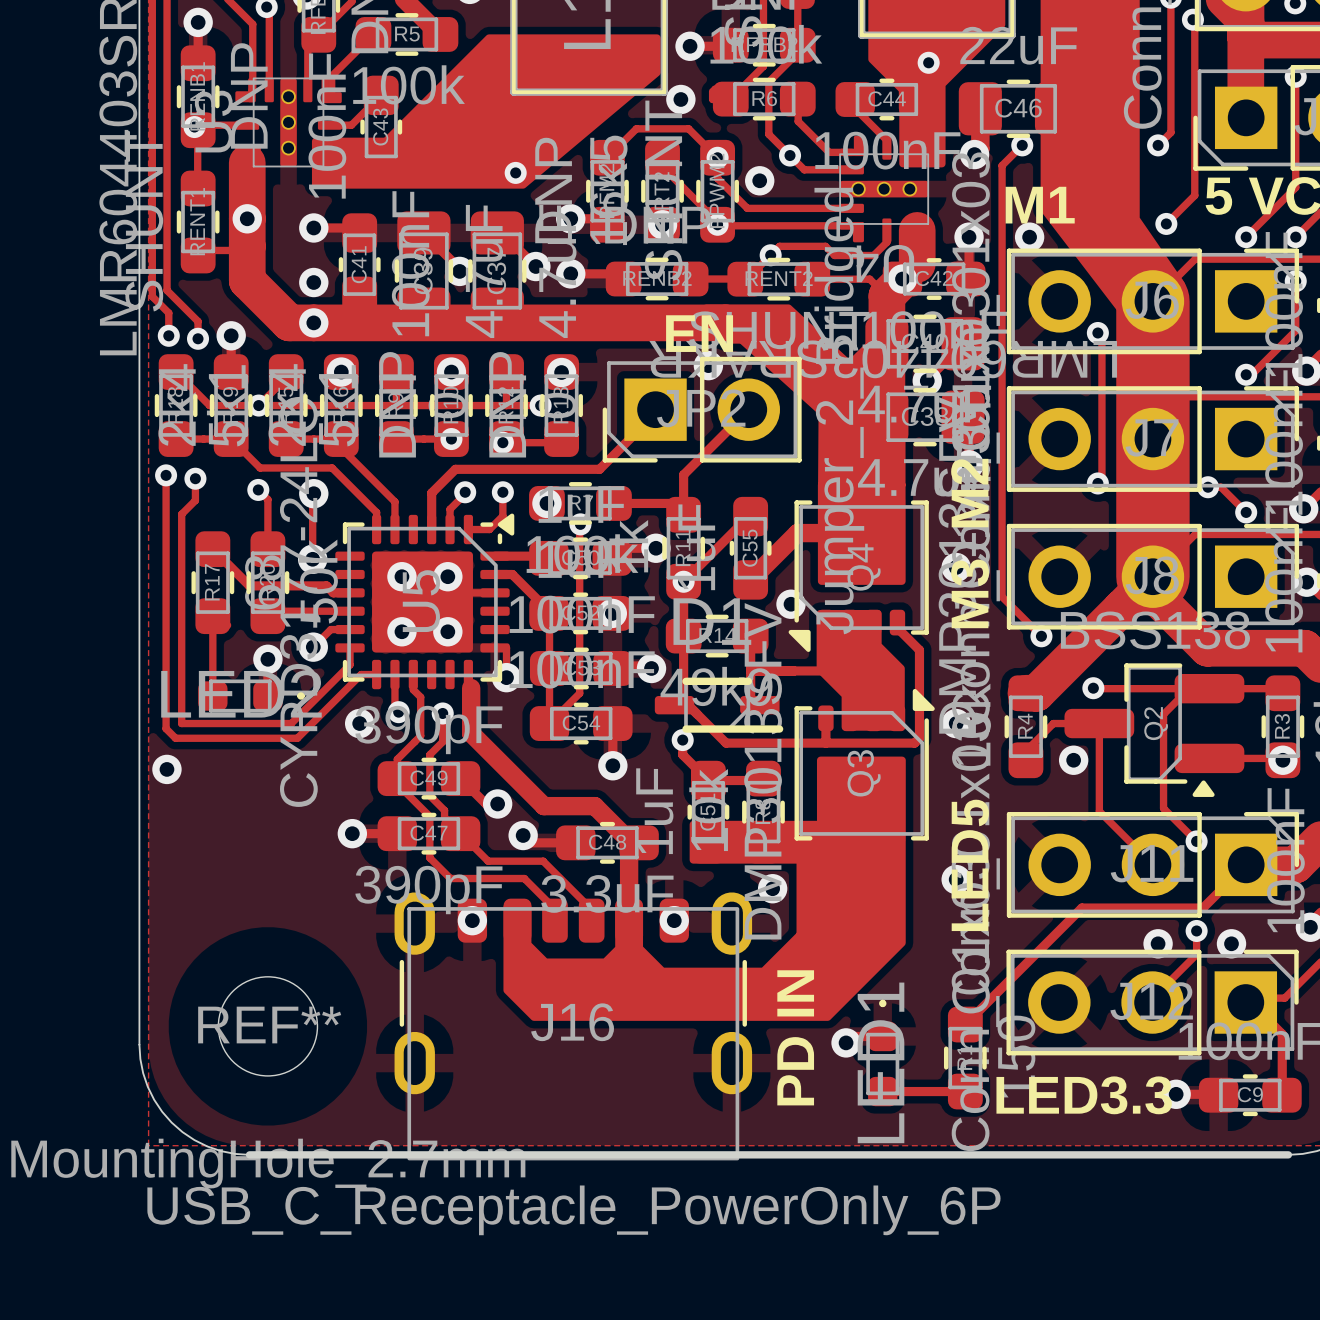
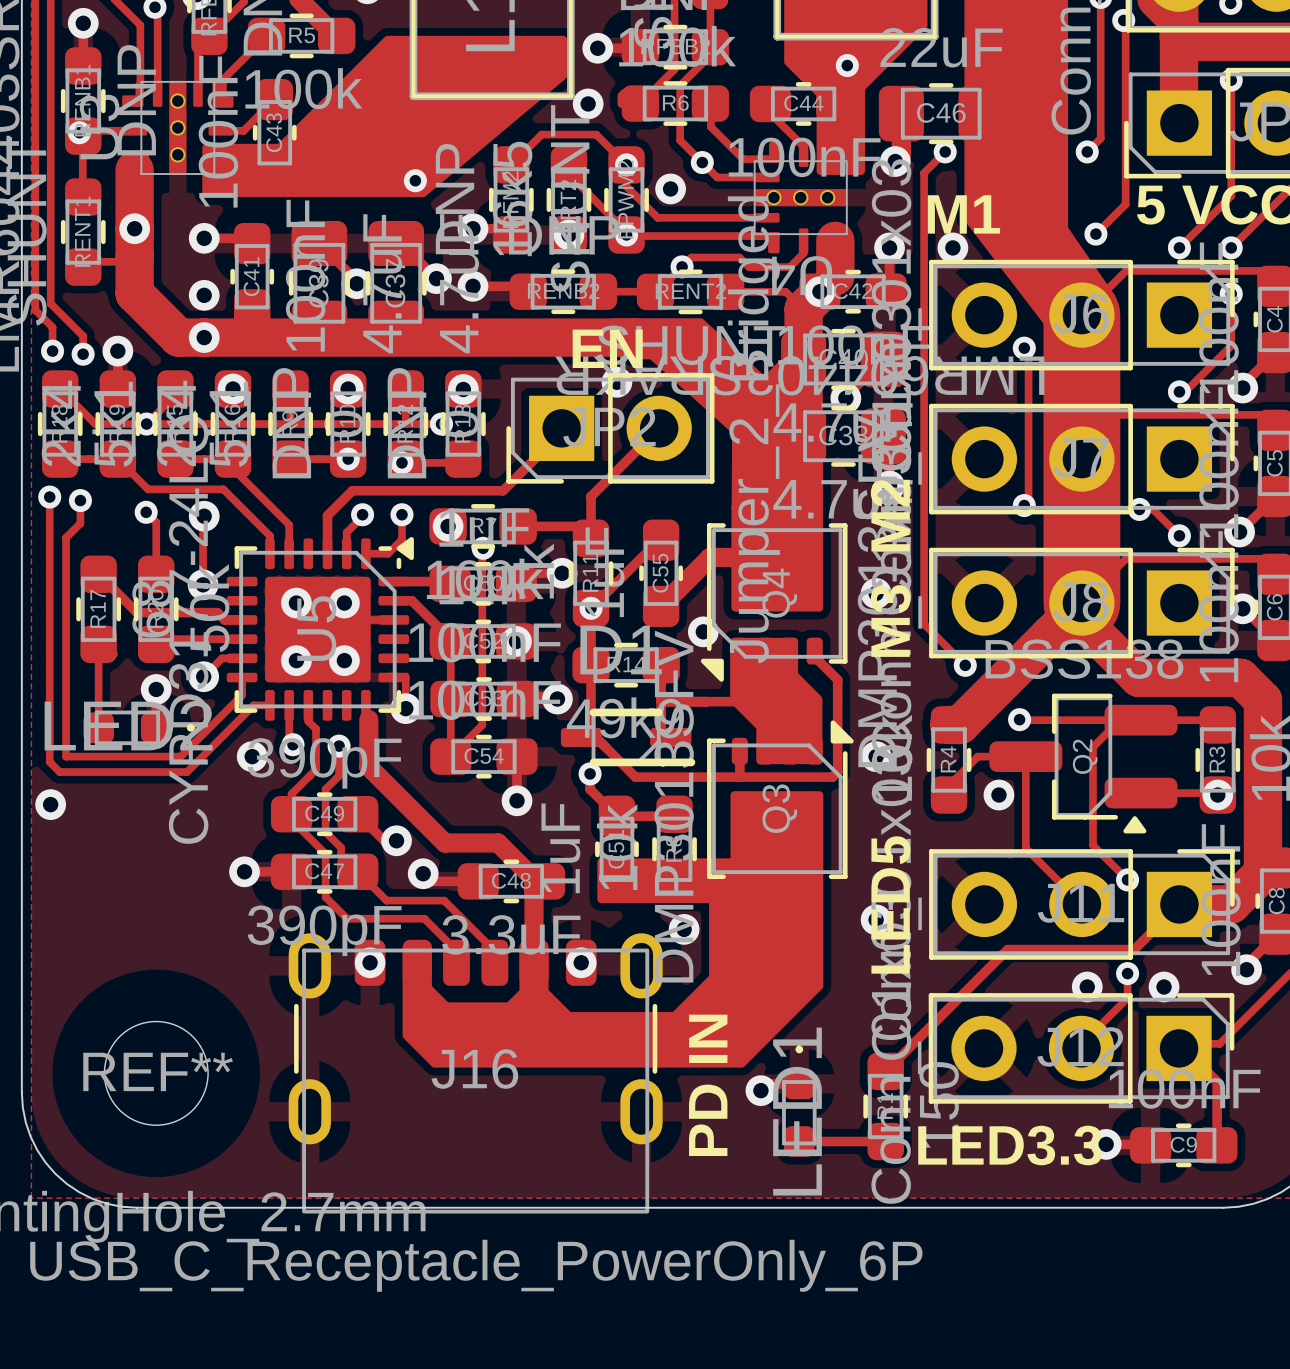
board edge width: thick (249, 1154) (1288, 1154) -> thin (137, 1207) (1223, 1207)

